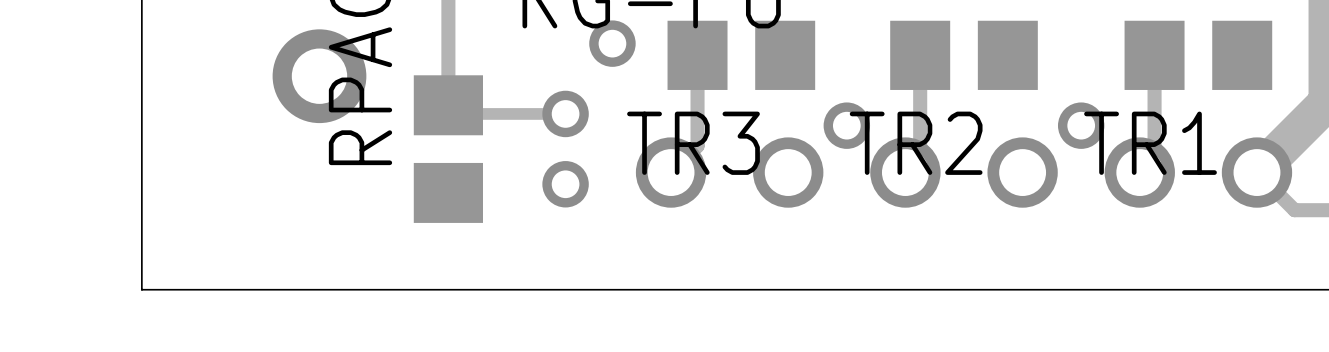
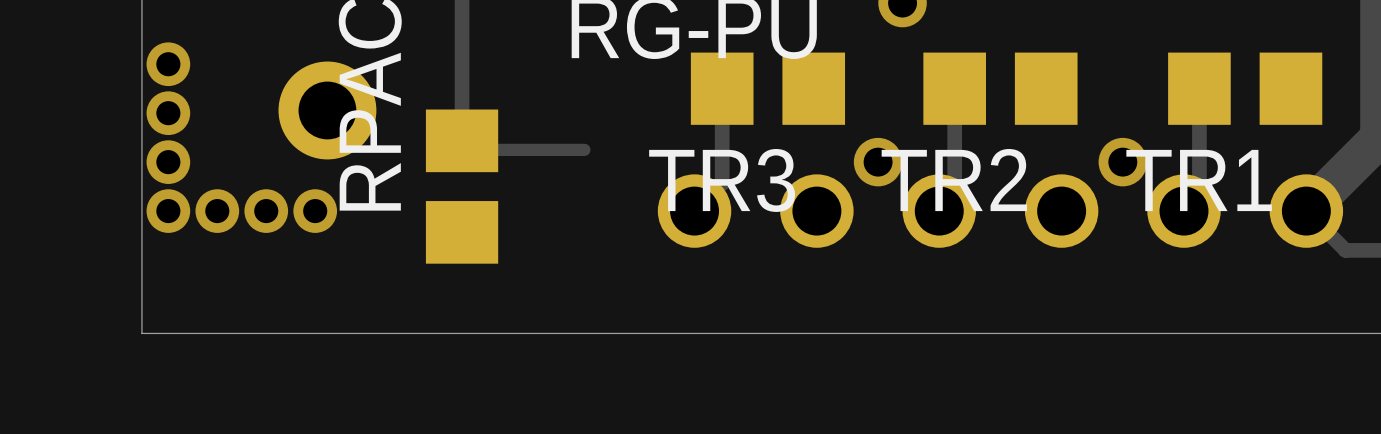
via: none -> (168, 64)
via: (612, 43) -> none
via: none -> (168, 113)
via: (565, 113) -> none
via: none -> (168, 162)
via: none -> (168, 211)
via: none -> (217, 211)
via: none -> (266, 211)
via: none -> (315, 211)
via: (565, 184) -> none

